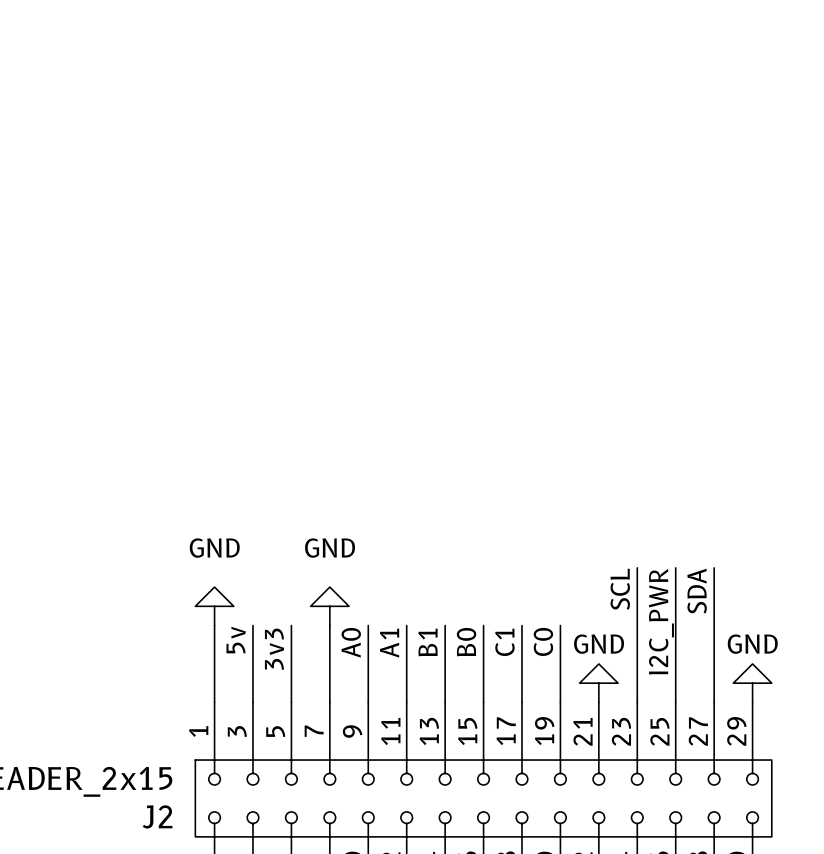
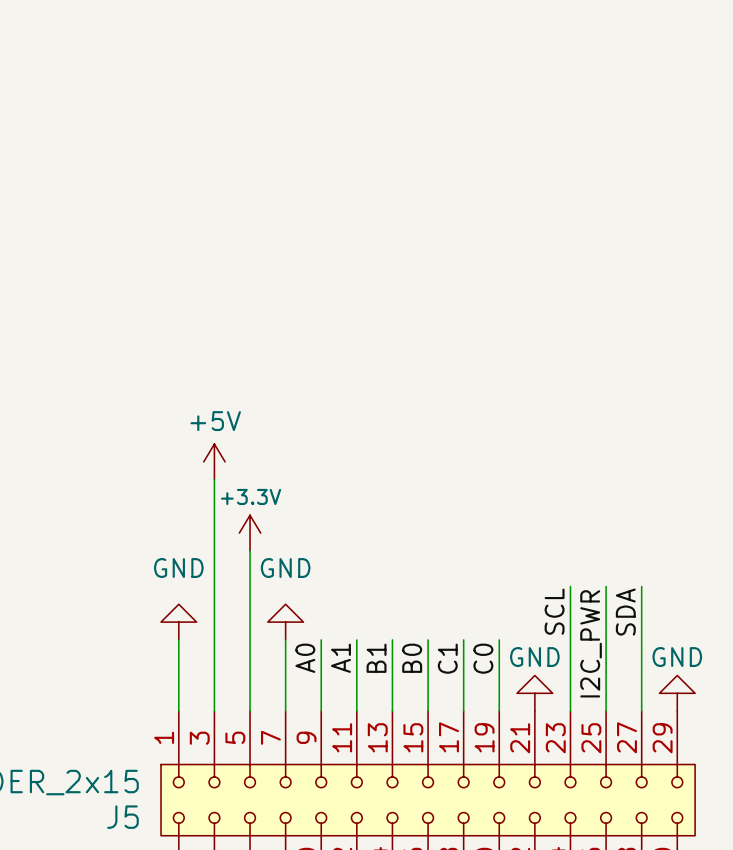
power symbol: none -> +5V (214, 461)
wire: none -> (214, 479) (214, 639)
power symbol: none -> +3.3V (250, 533)
wire: none -> (250, 550) (250, 639)
label: 5v (236, 640) -> none
label: 3v3 (274, 649) -> none
J2 name: J2 (157, 816) -> J5 (122, 817)

